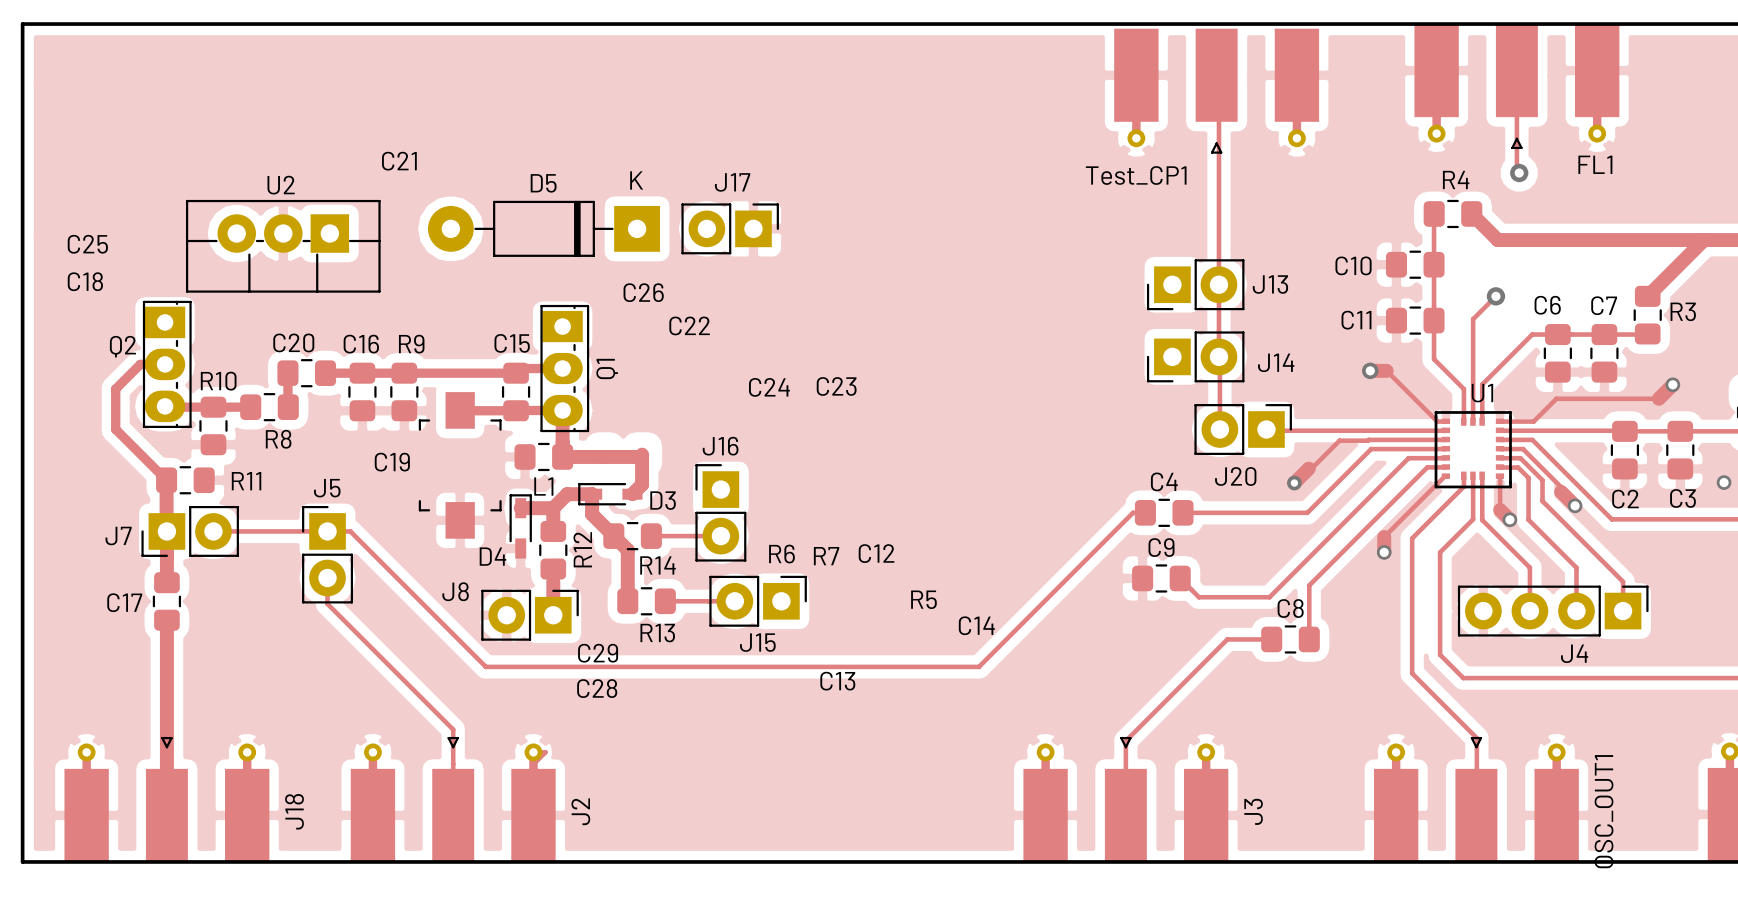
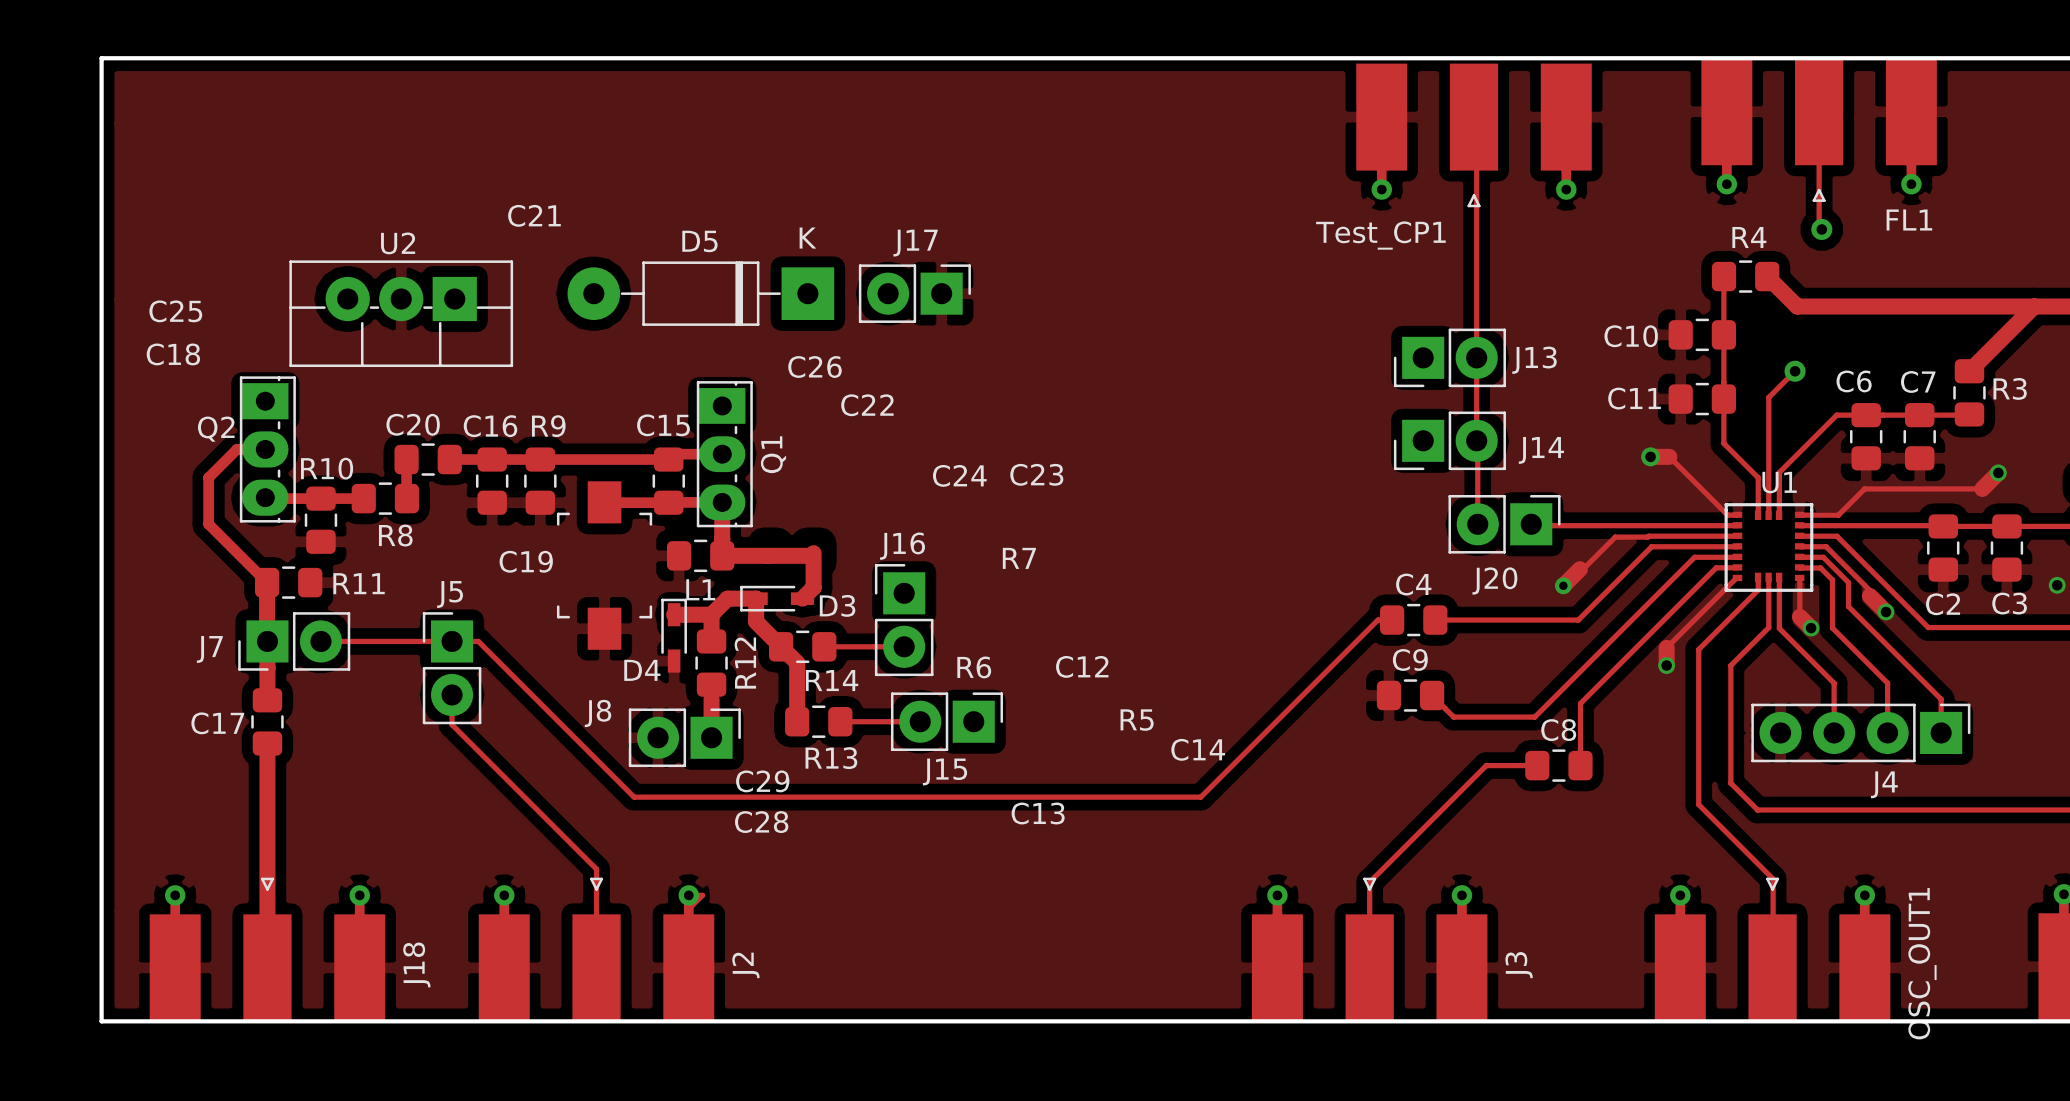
R7 position: (826, 556) -> (1019, 558)

